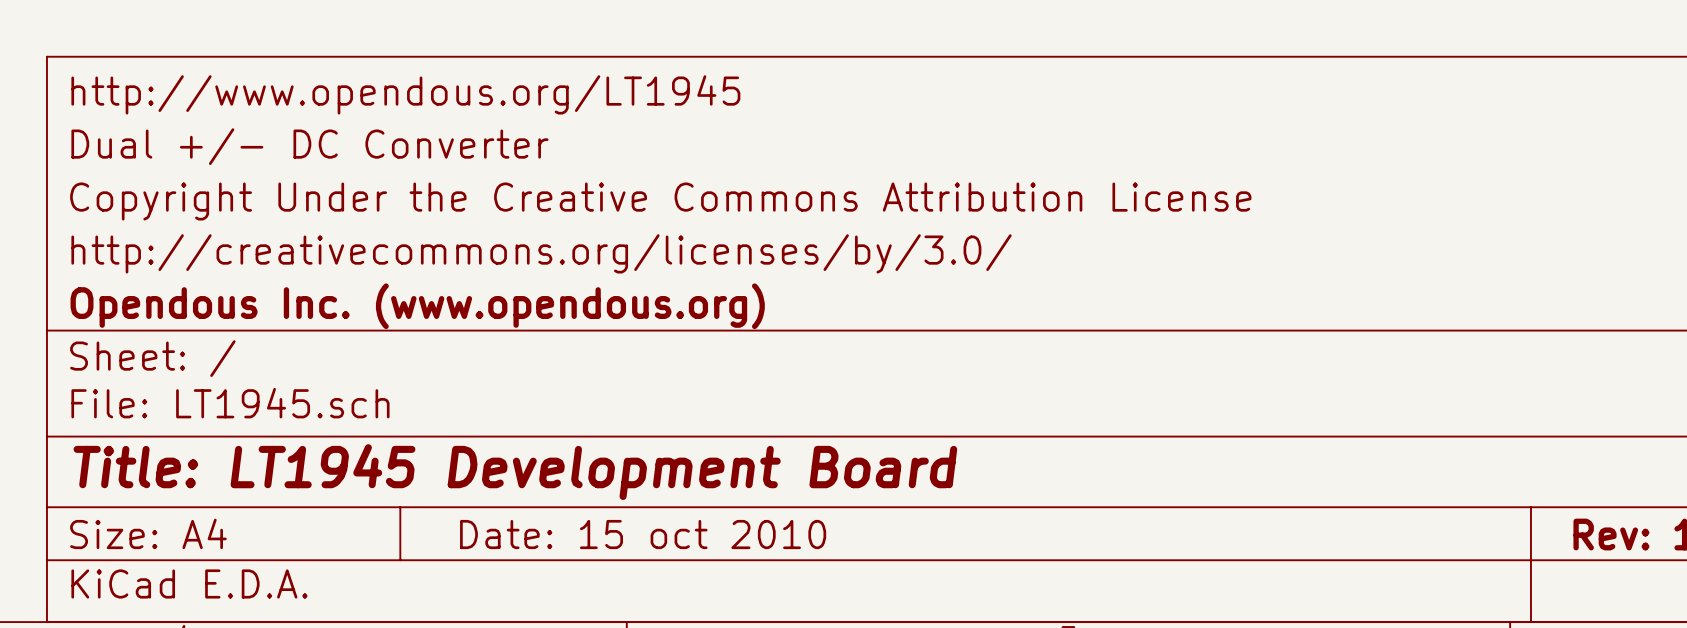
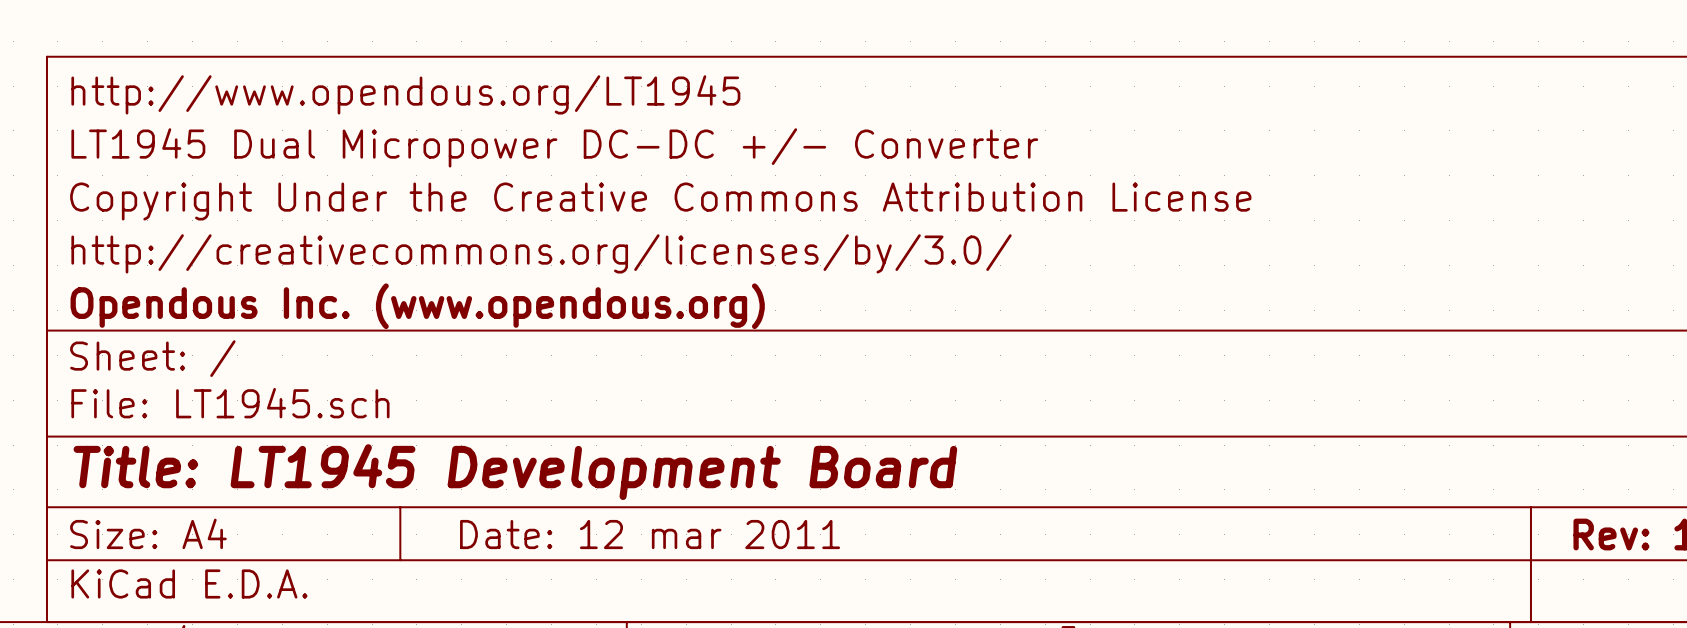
title block: Dual +/- DC Converter (309, 146) -> LT1945 Dual Micropower DC-DC +/- Converter (554, 147)
title block: Date: 15 oct 2010 (643, 534) -> Date: 12 mar 2011 (650, 534)

